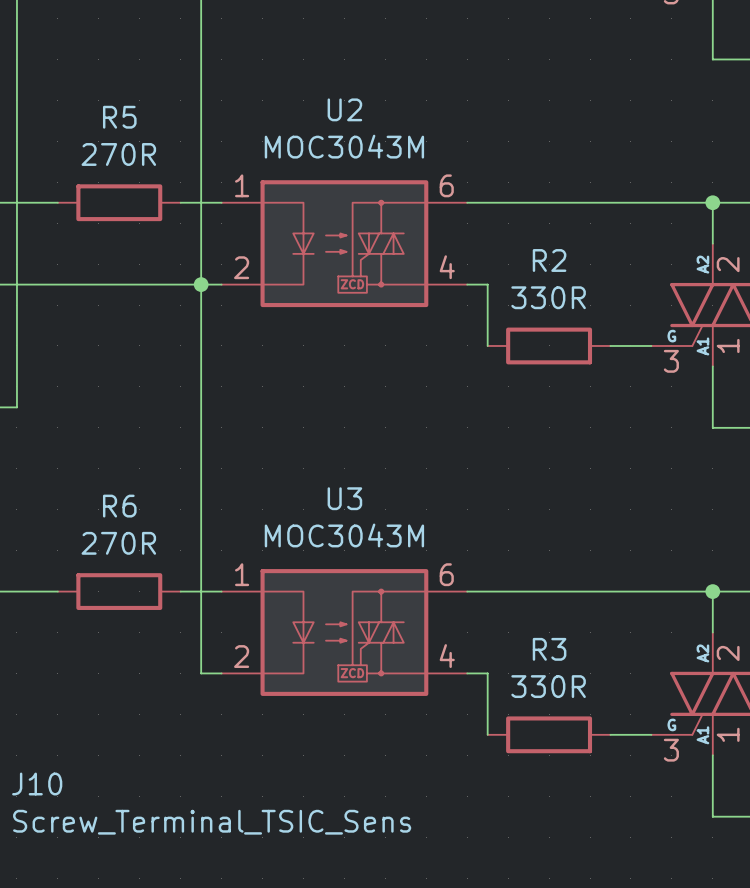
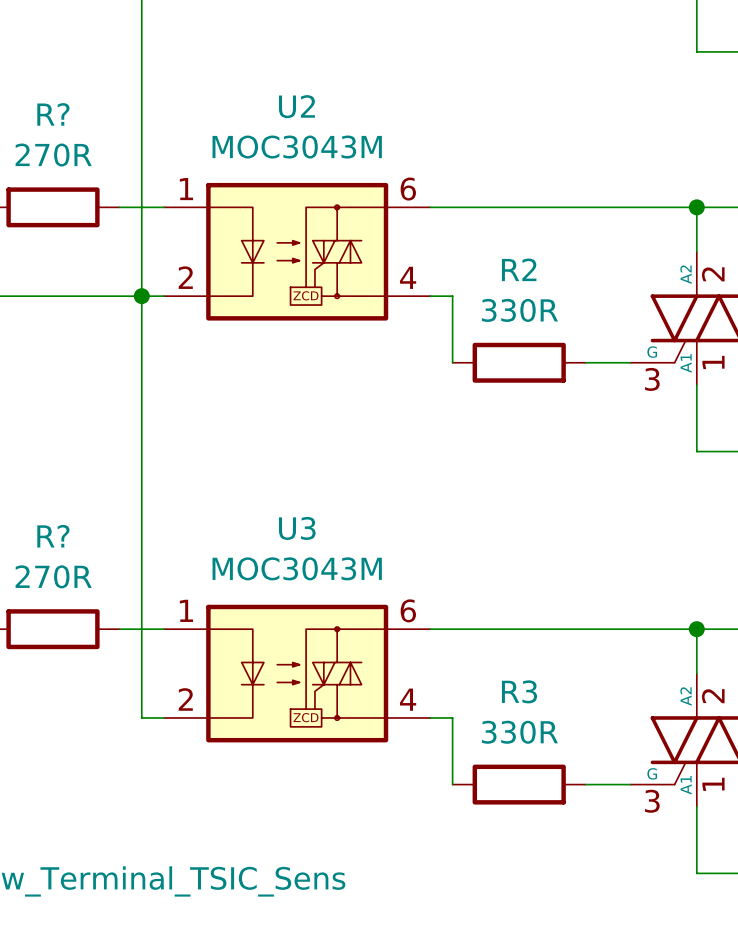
R5 name: R5 (119, 117) -> R? (53, 114)
R6 name: R6 (119, 506) -> R? (53, 536)

